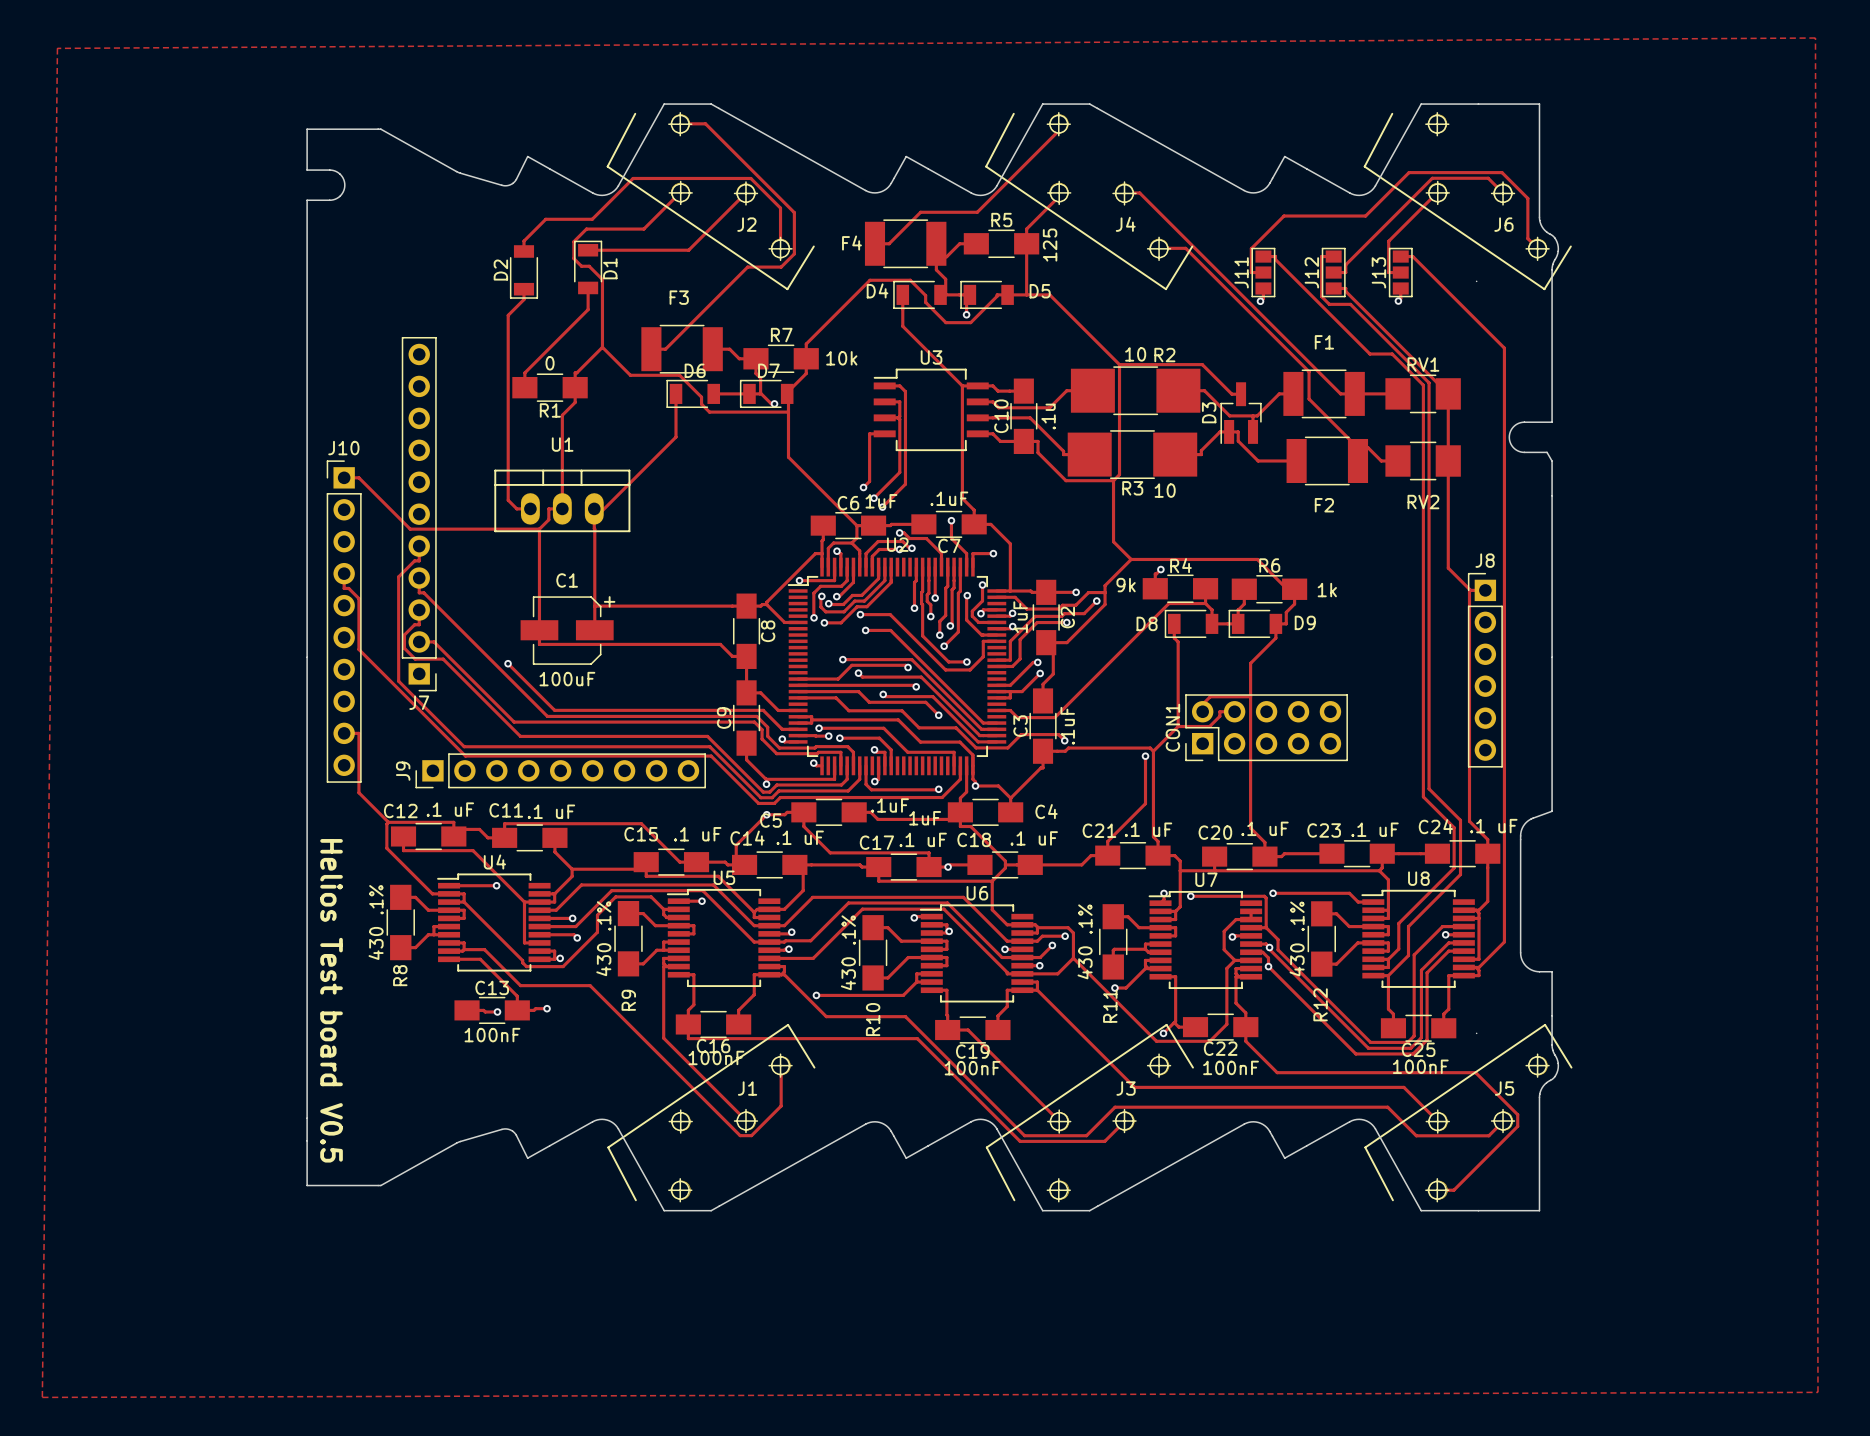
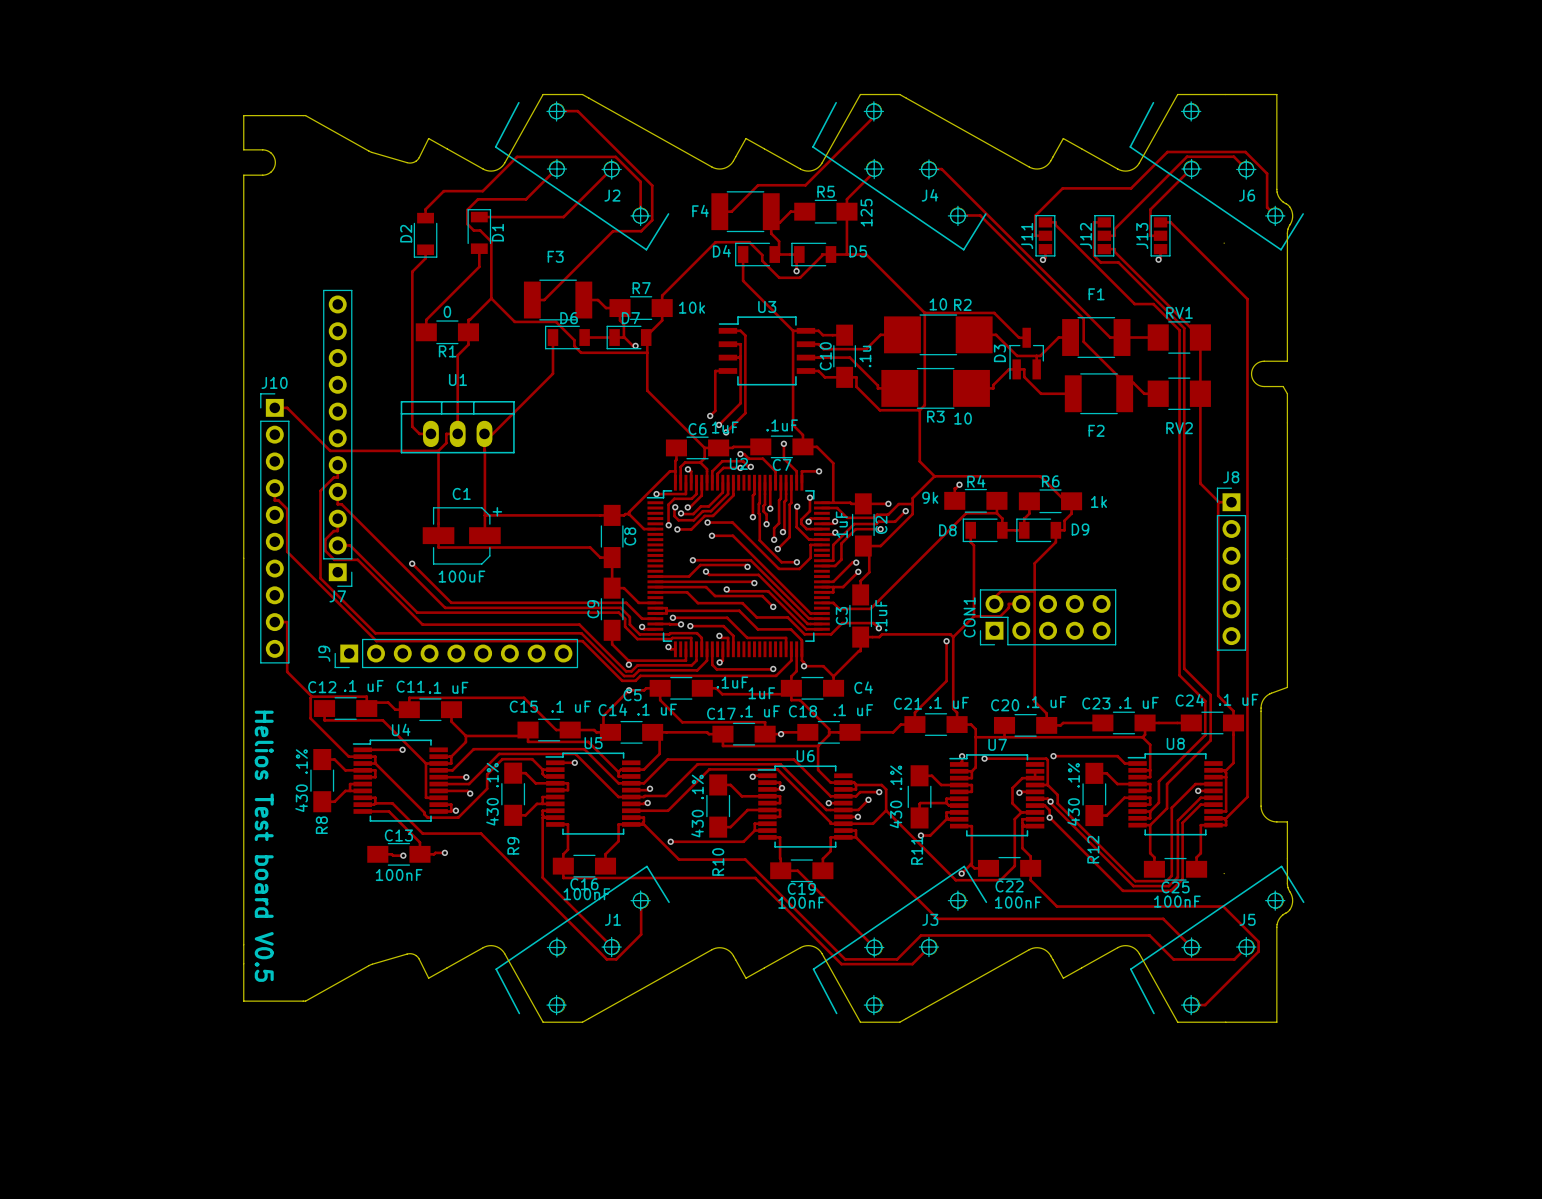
zone outline: (1815, 38) (1817, 1392) (42, 1397) (57, 48) (1815, 38) -> none

